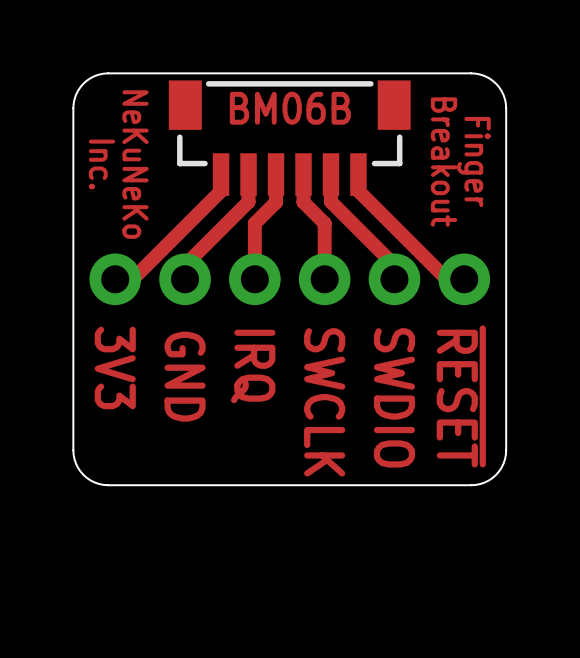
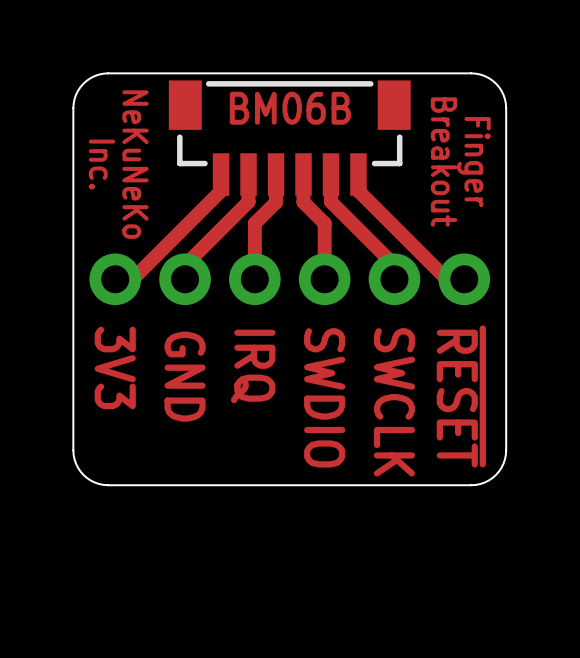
text: SWDIO (394, 397) -> SWCLK (394, 402)
text: SWCLK (324, 402) -> SWDIO (324, 397)

